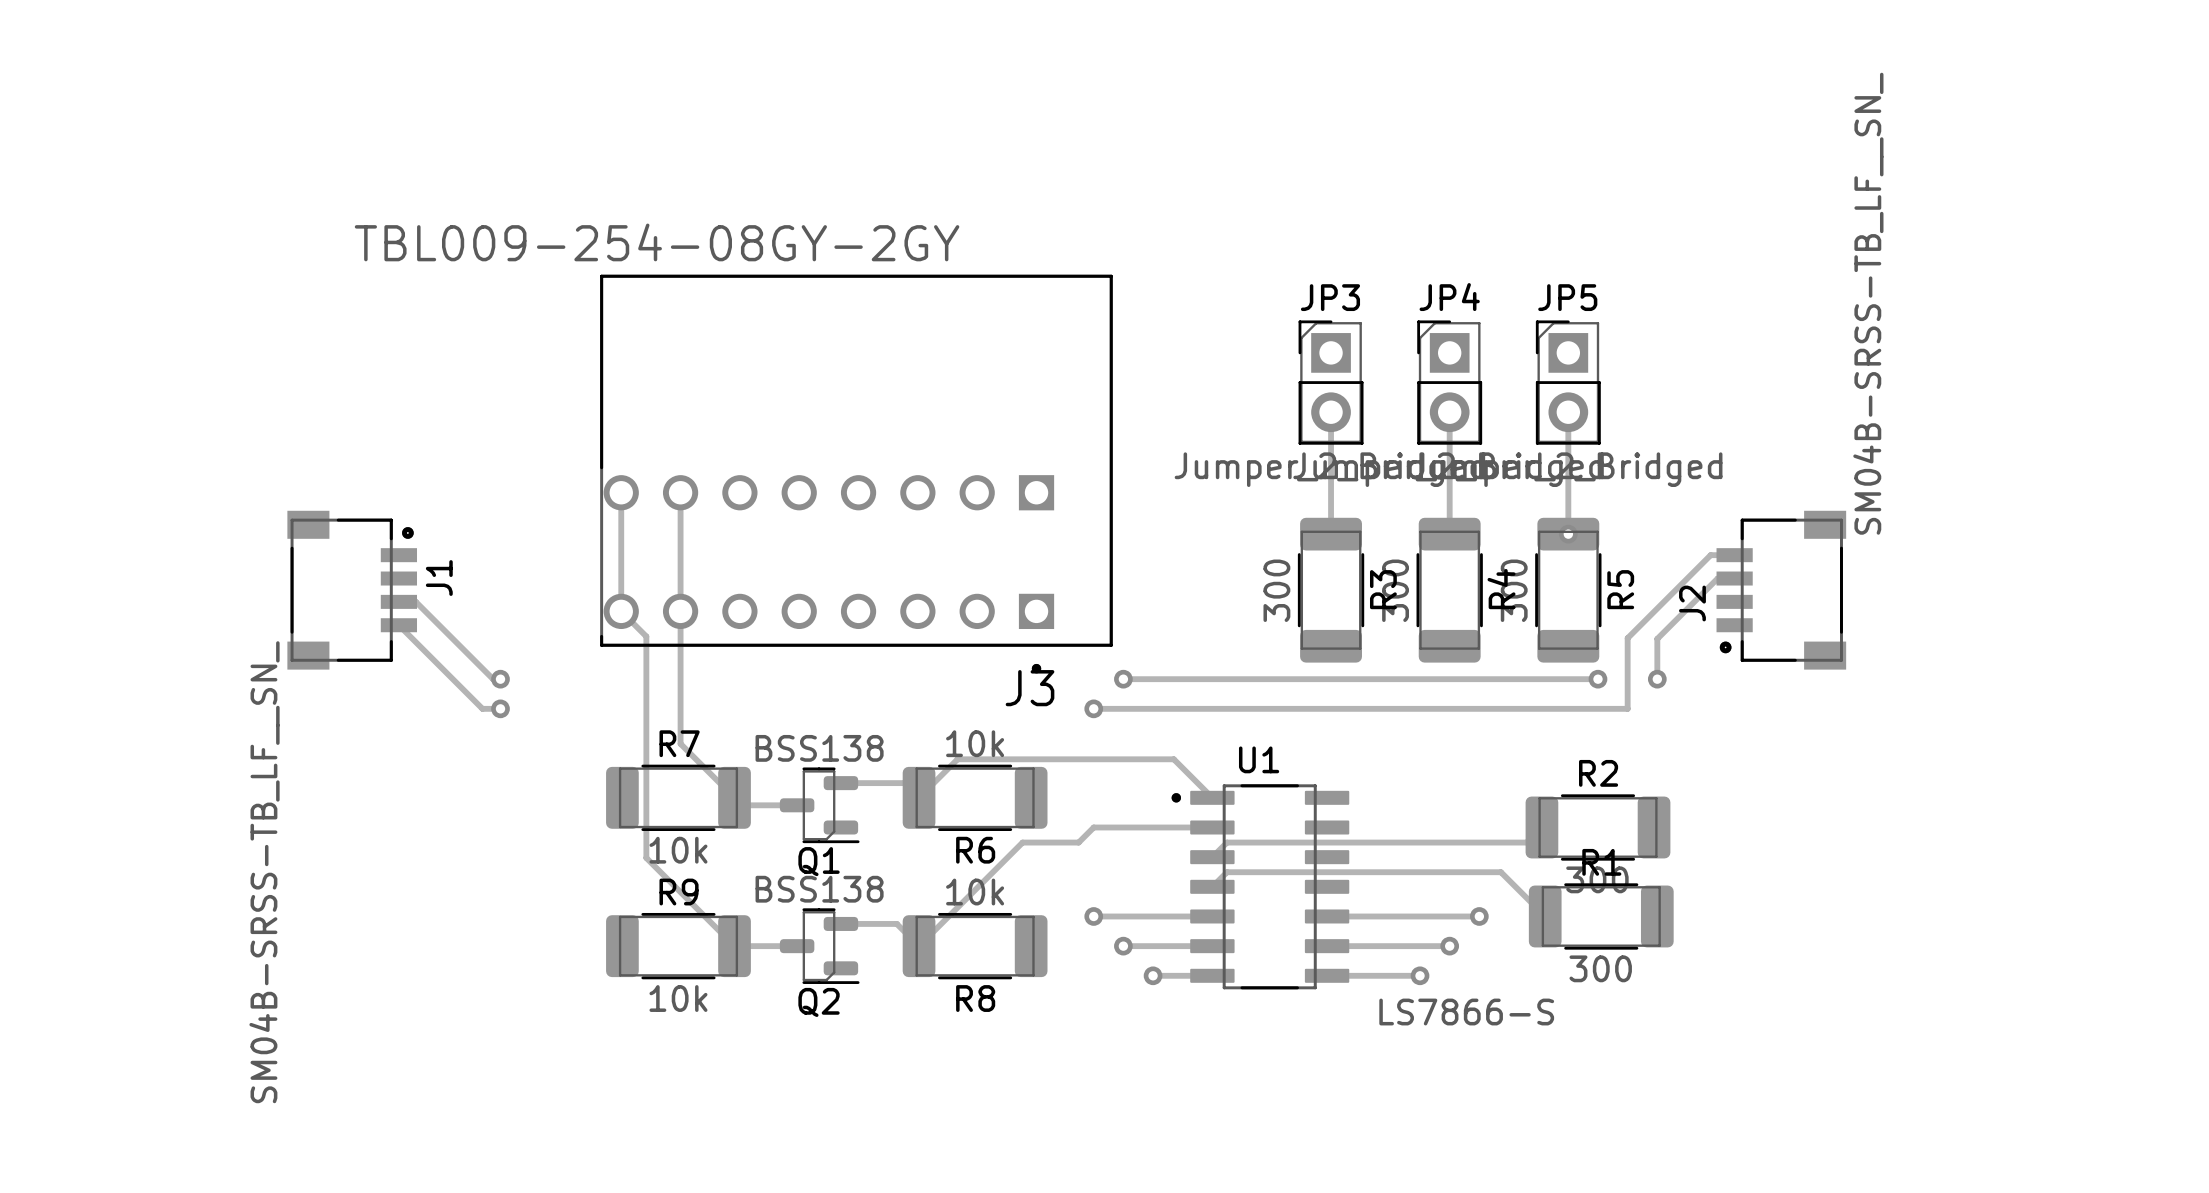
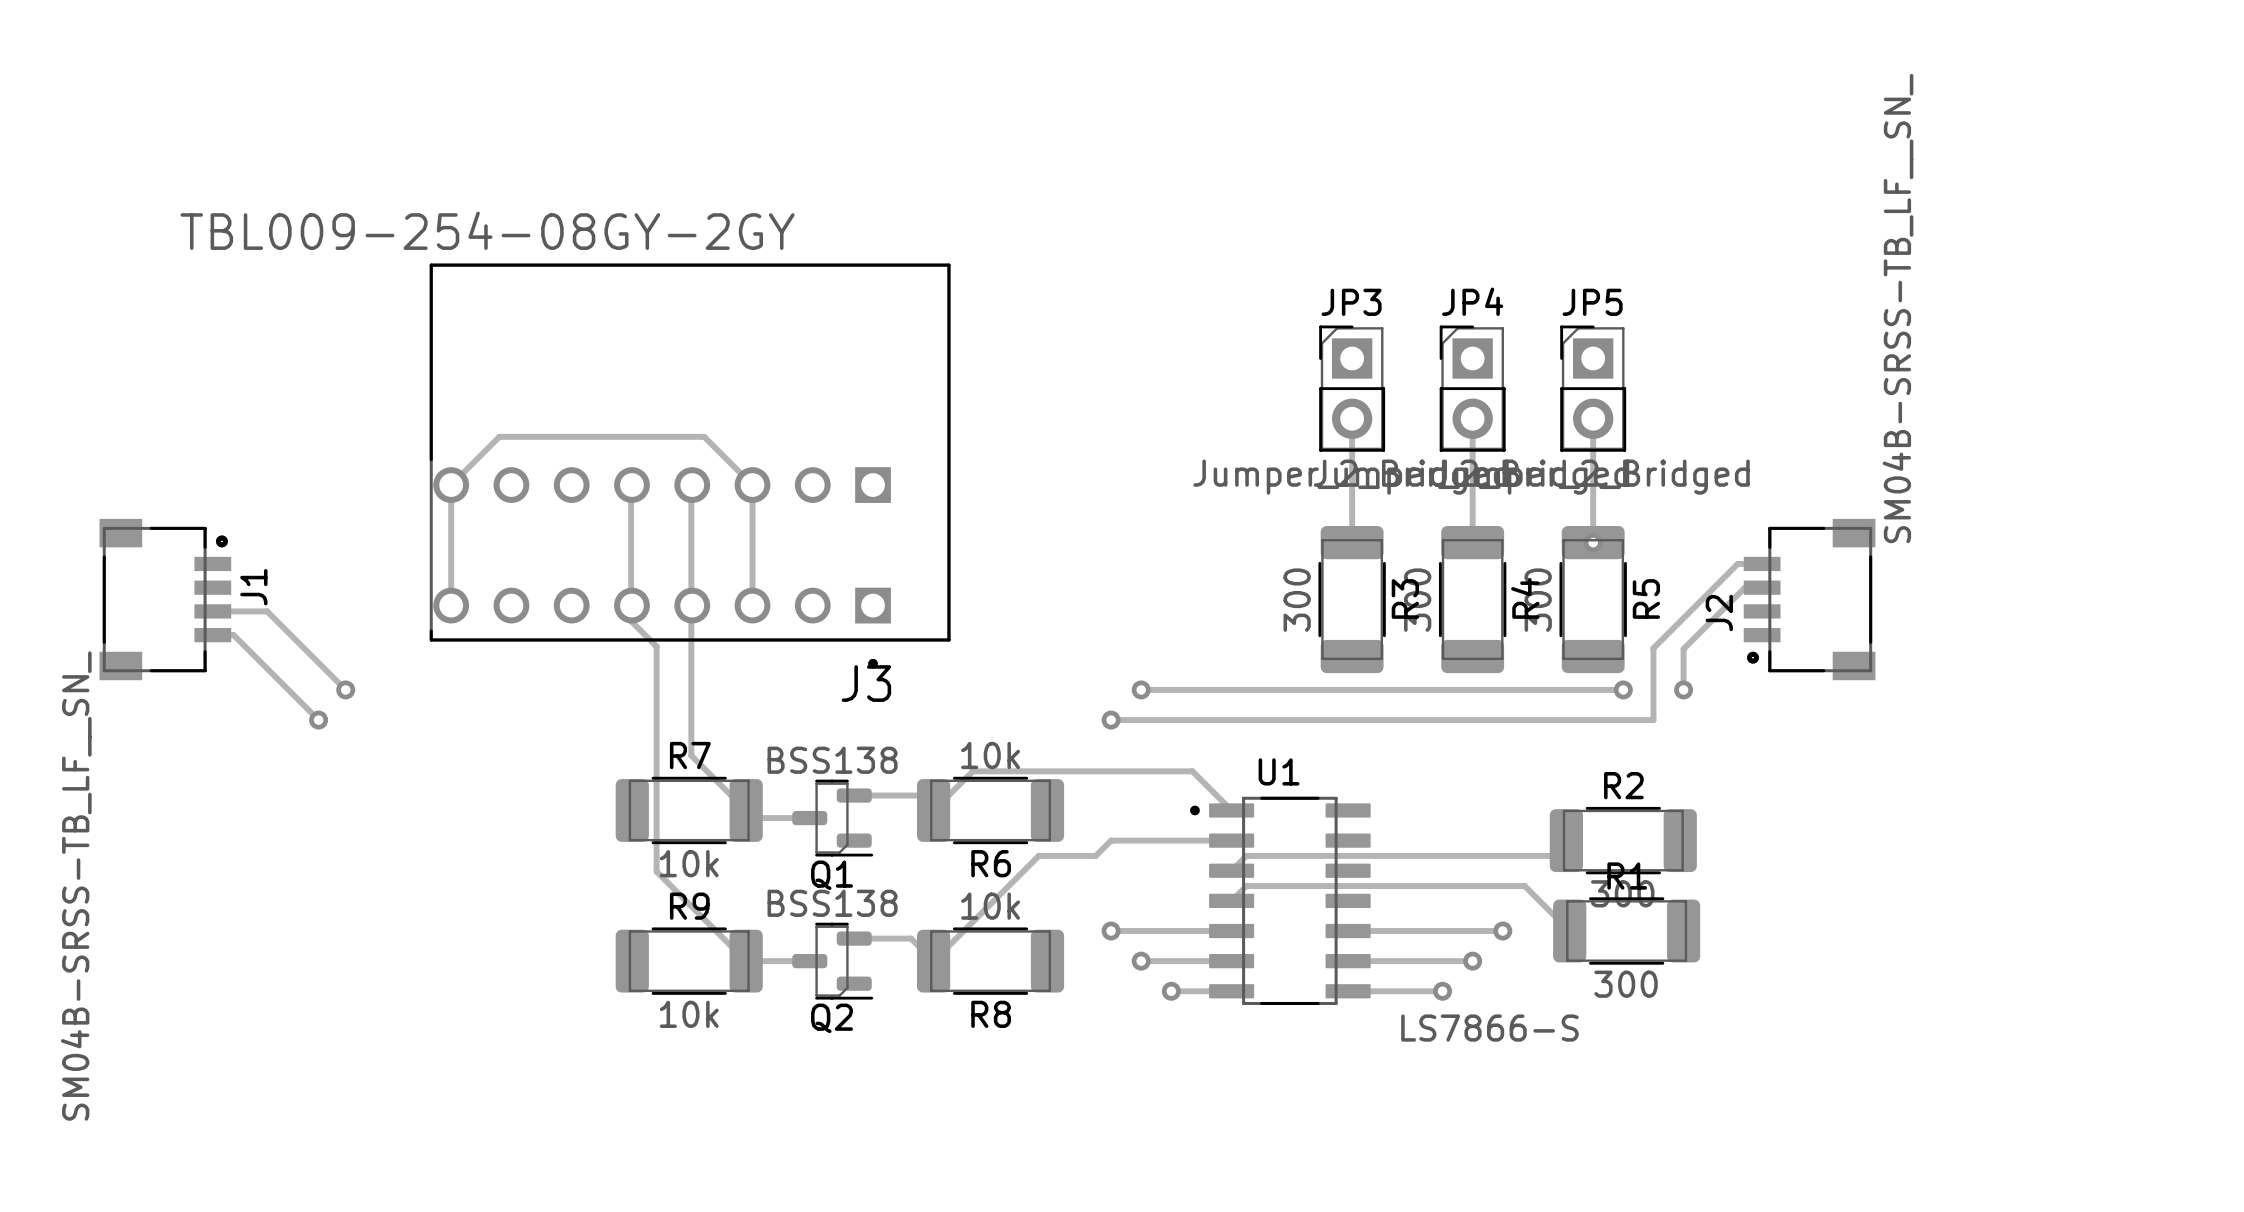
J3 position: (856, 474) -> (690, 466)
J1 position: (352, 590) -> (165, 599)
track: none -> (451, 605) (451, 485) (499, 436) (704, 436) (752, 485) (752, 605)
track: none -> (212, 611) (267, 611) (345, 689)
track: (398, 601) (415, 601) (493, 679) (500, 679) -> none
track: none -> (212, 635) (233, 635) (318, 720)
track: (398, 625) (482, 708) (500, 708) -> none
via: none -> (345, 689)
via: (500, 679) -> none
via: none -> (318, 720)
via: (500, 708) -> none

